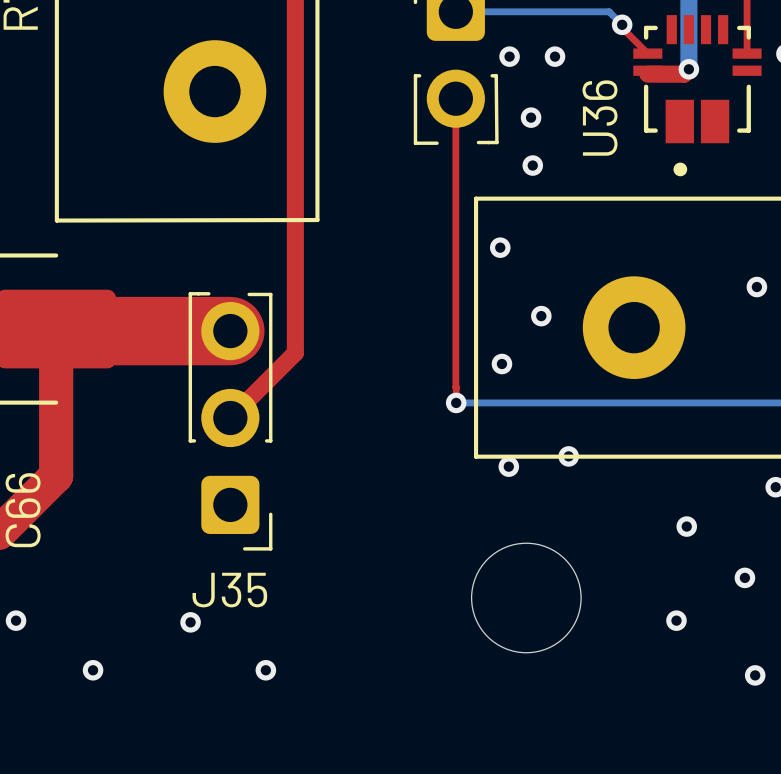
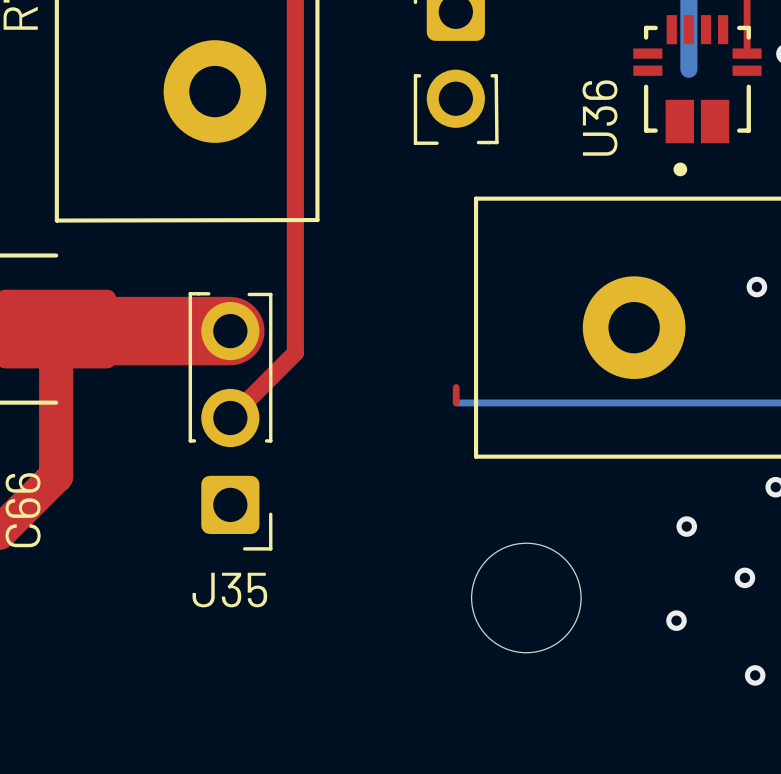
bottom track: (455, 11) (609, 11) (622, 24) -> none
top track: (622, 24) (624, 29) (647, 53) -> none
via: (622, 24) -> none
via: (509, 56) -> none
via: (555, 56) -> none
top track: (688, 69) (684, 74) (647, 74) -> none
via: (688, 69) -> none
top track: (455, 98) (455, 387) -> none
via: (531, 117) -> none
via: (532, 165) -> none
via: (500, 247) -> none
via: (541, 316) -> none
via: (501, 364) -> none
via: (456, 402) -> none
via: (568, 456) -> none
via: (508, 466) -> none
via: (16, 620) -> none
via: (190, 622) -> none
via: (93, 670) -> none
via: (265, 670) -> none

